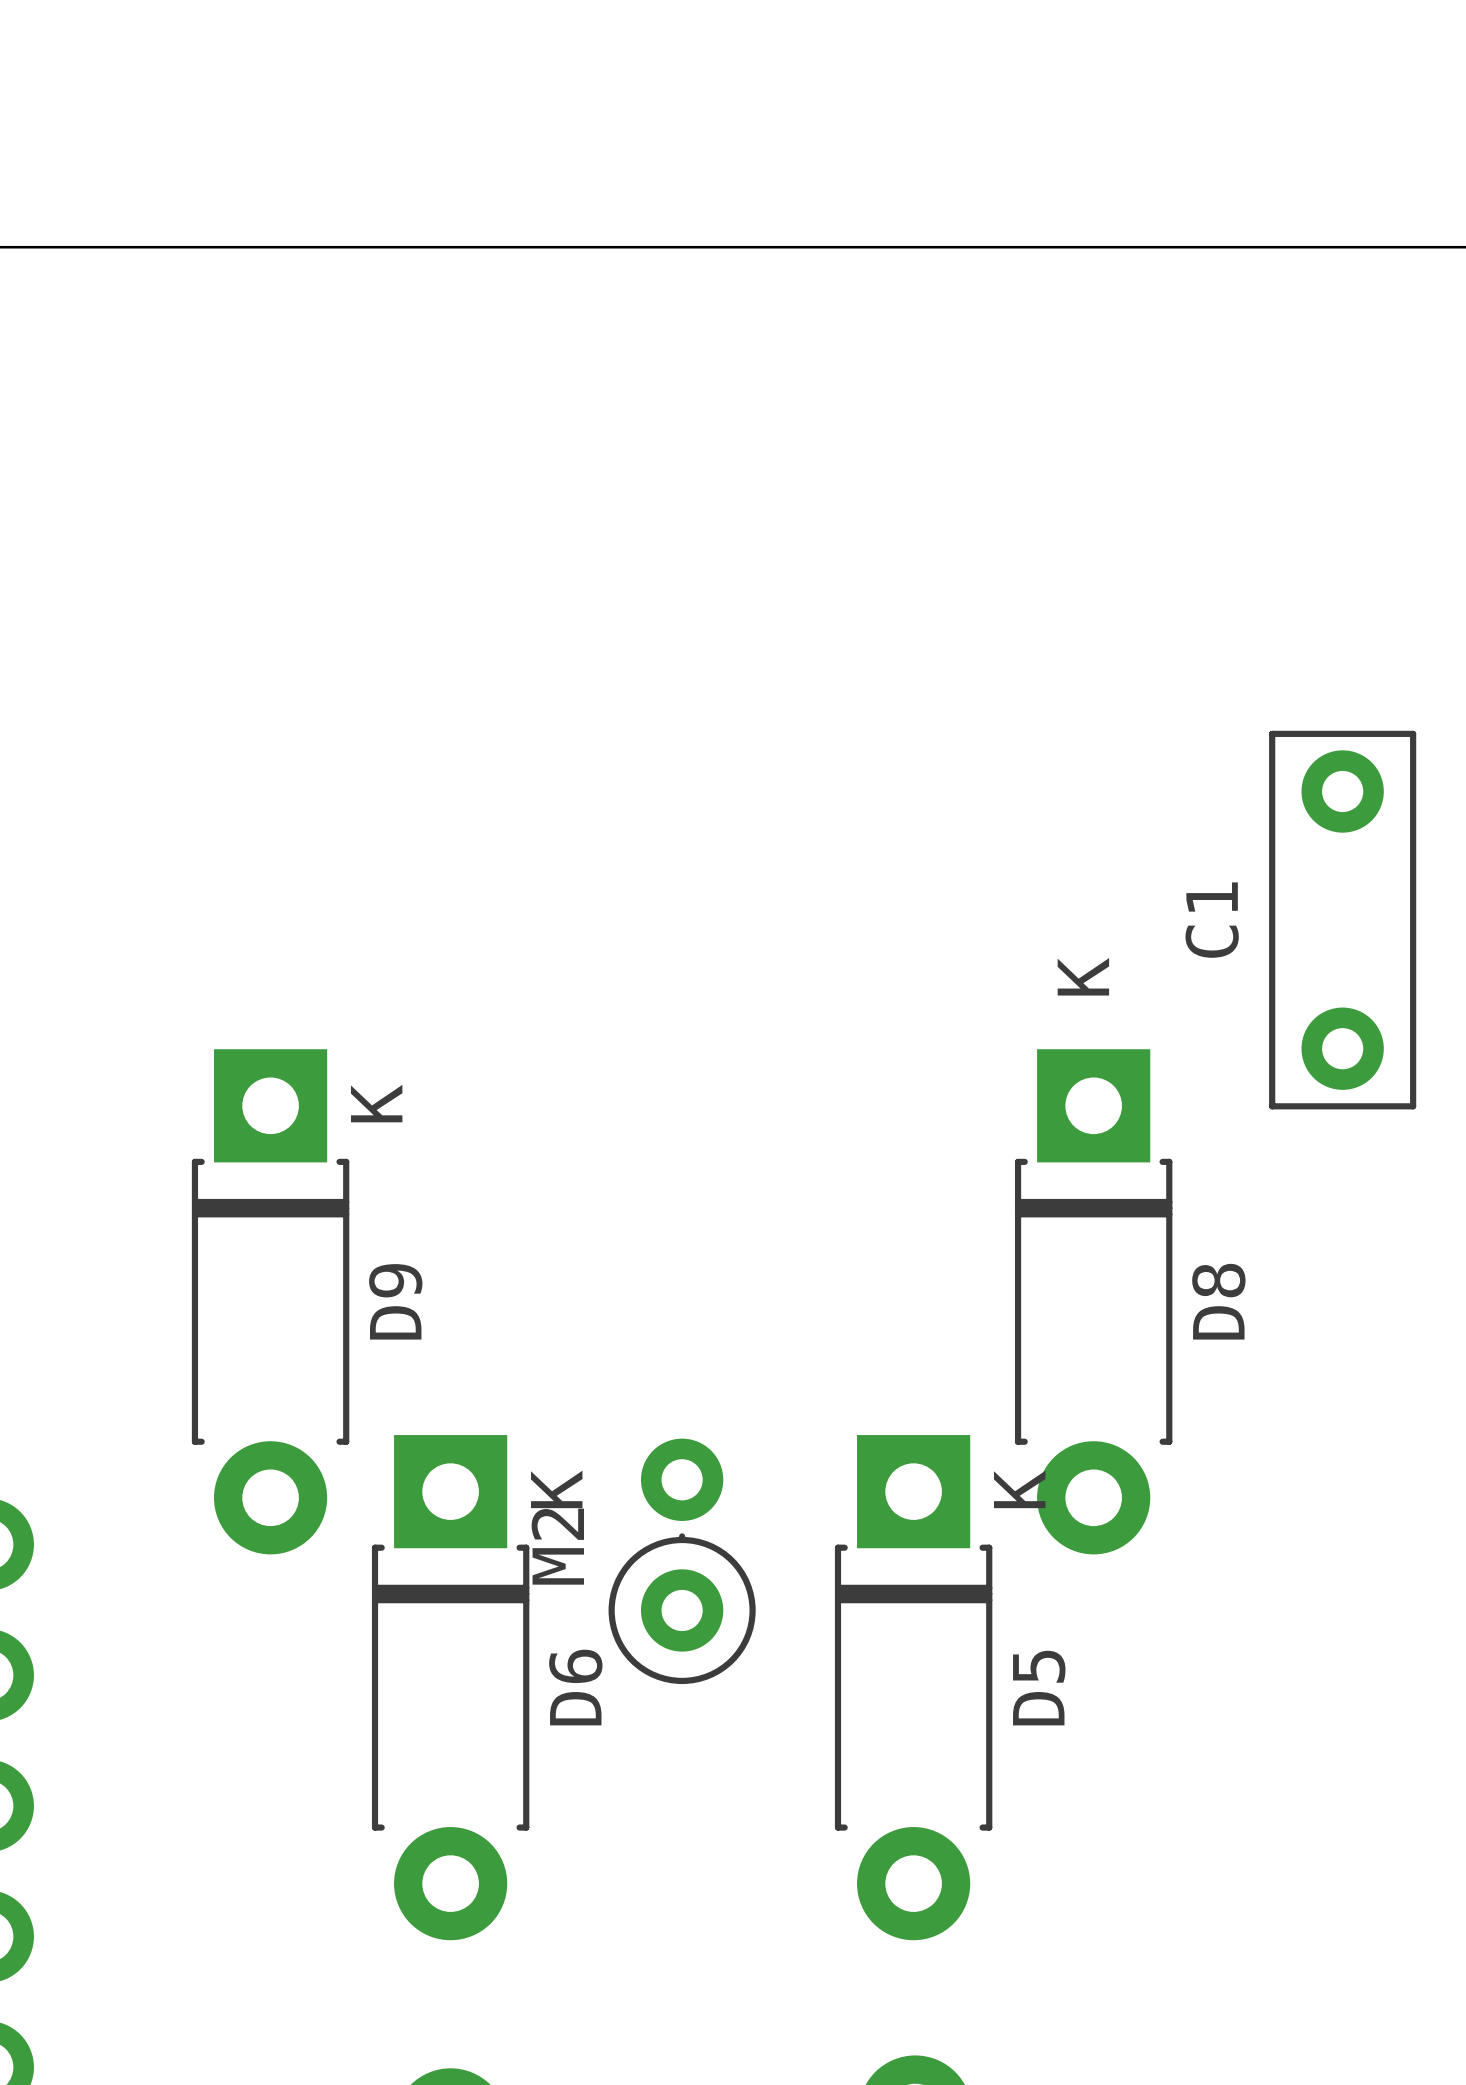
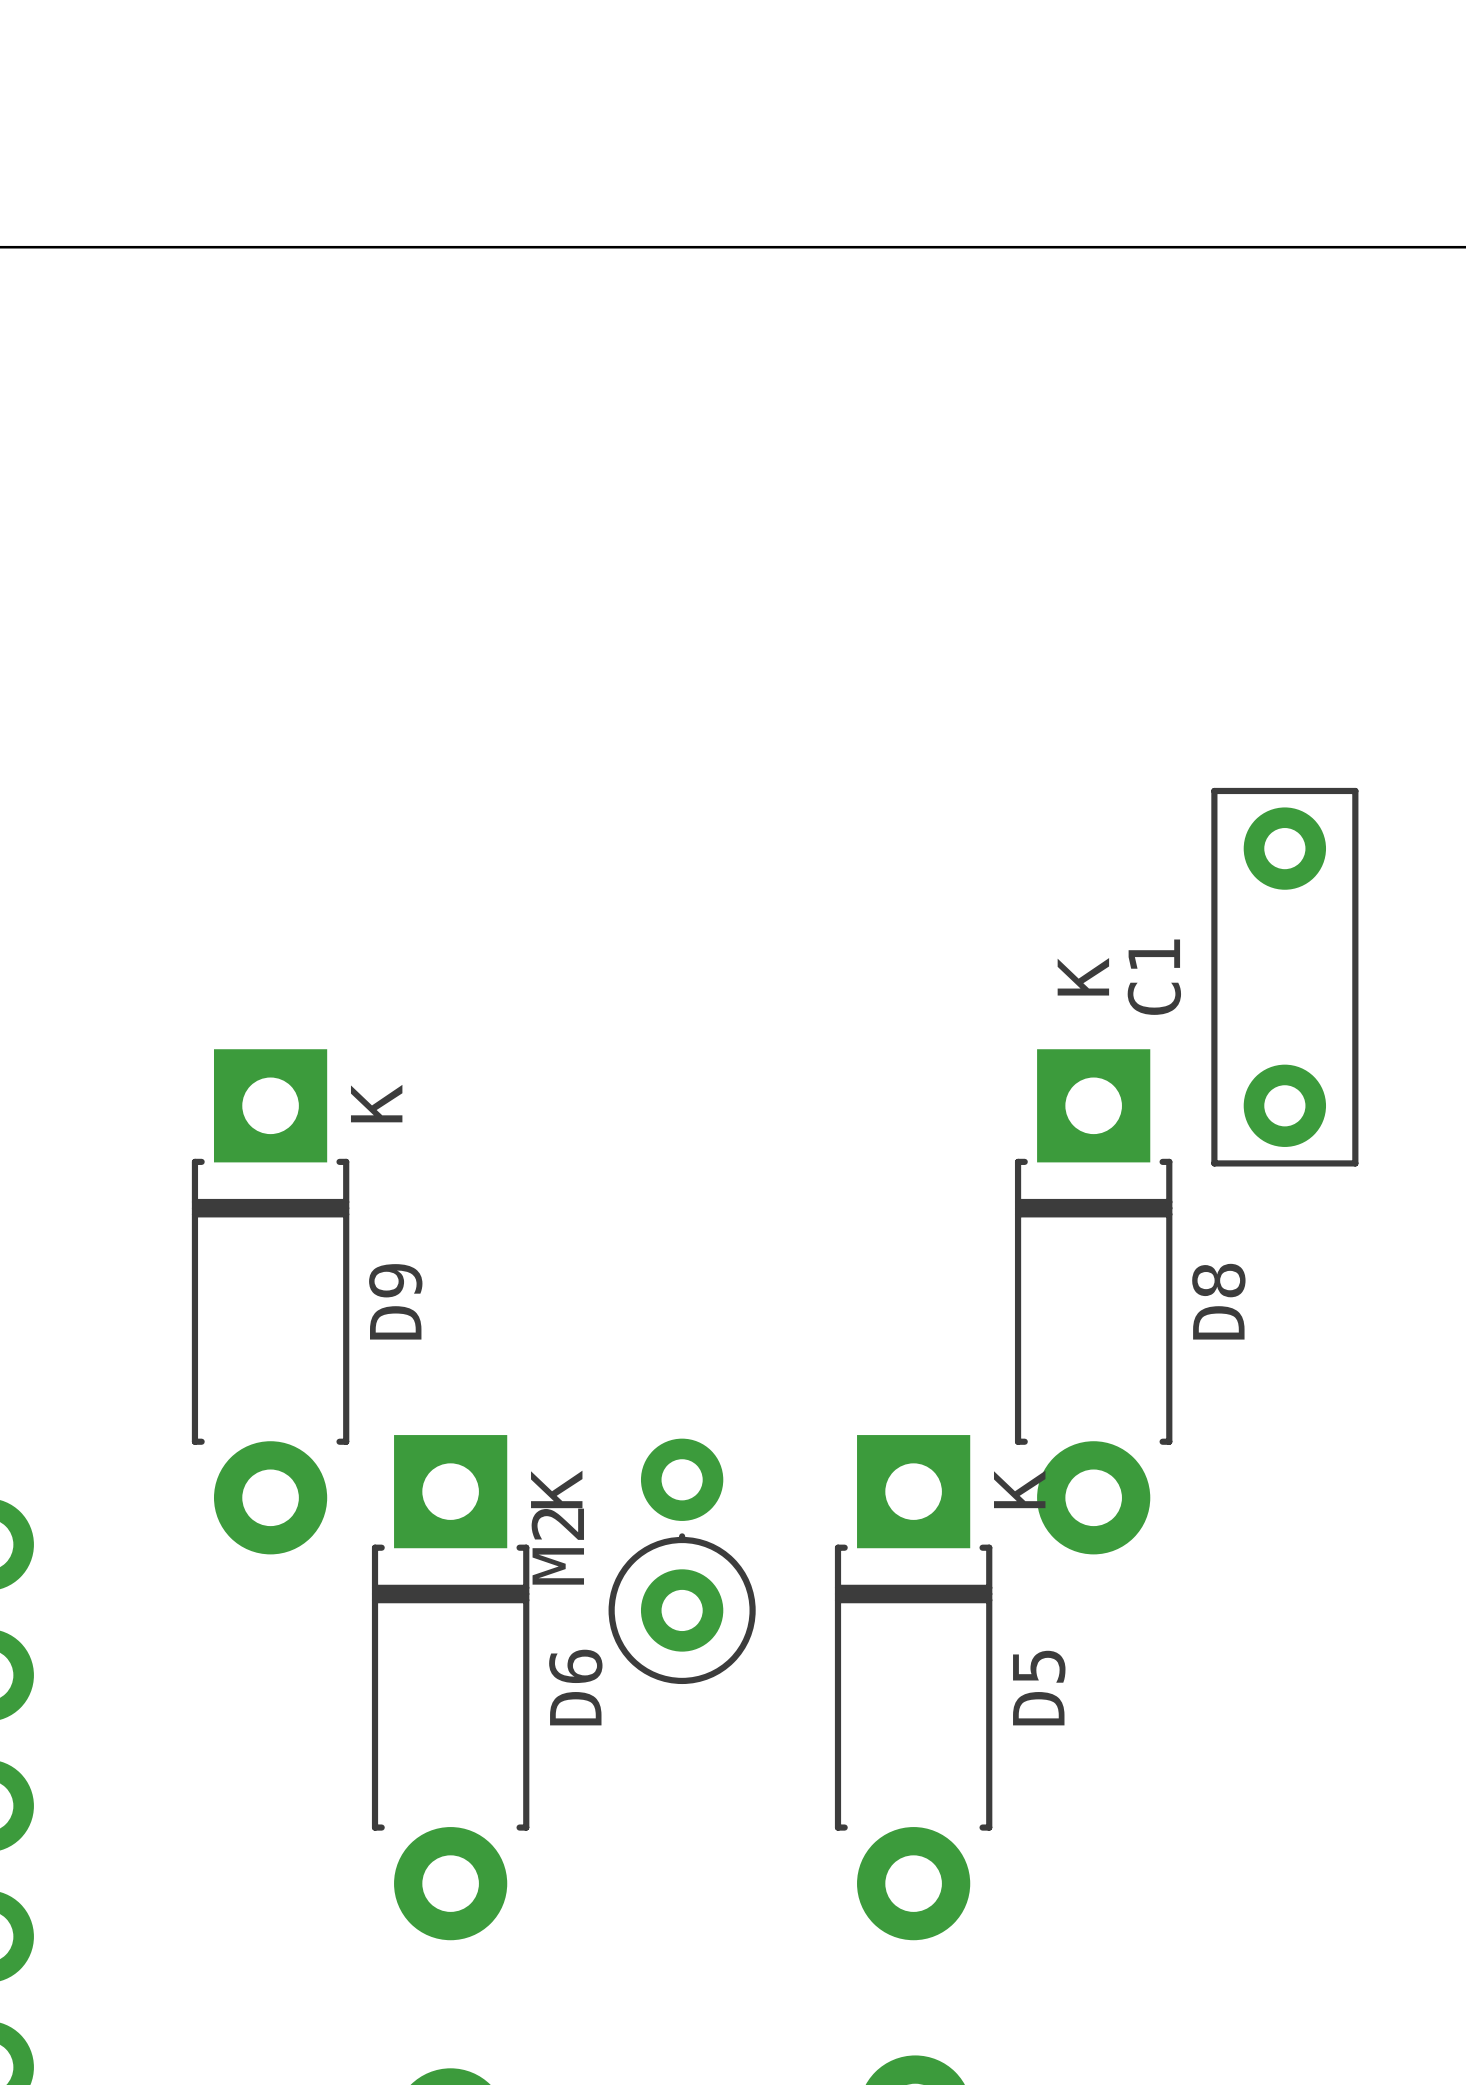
C1 position: (1342, 920) -> (1284, 977)

